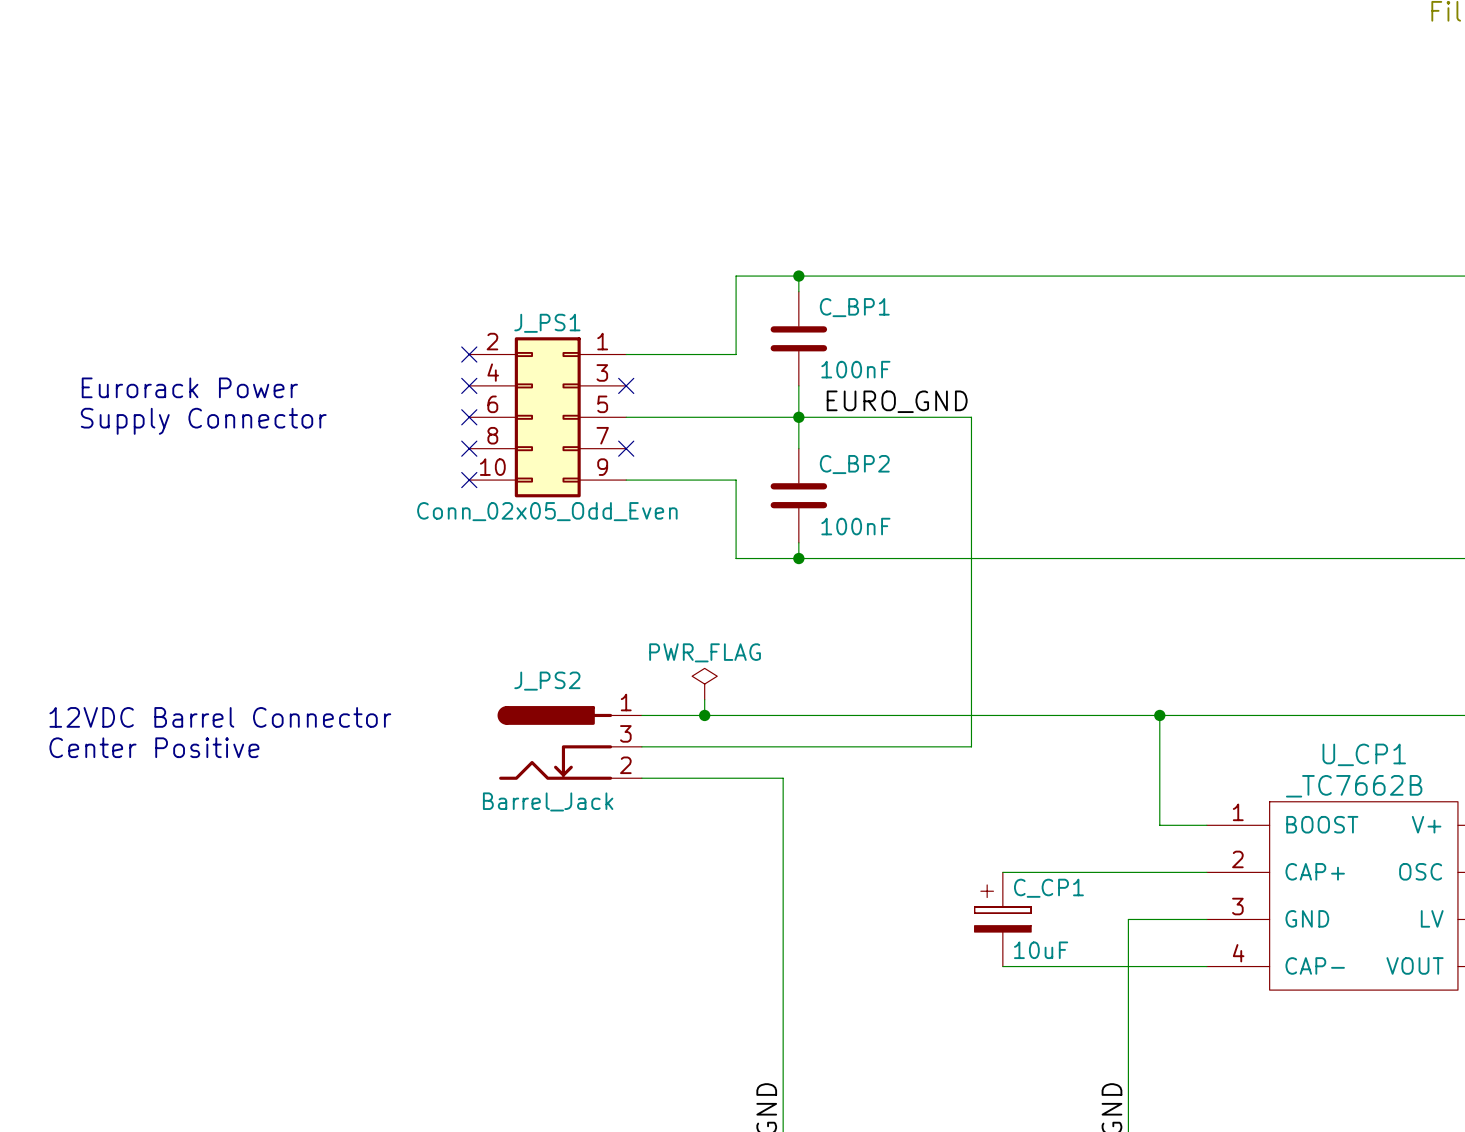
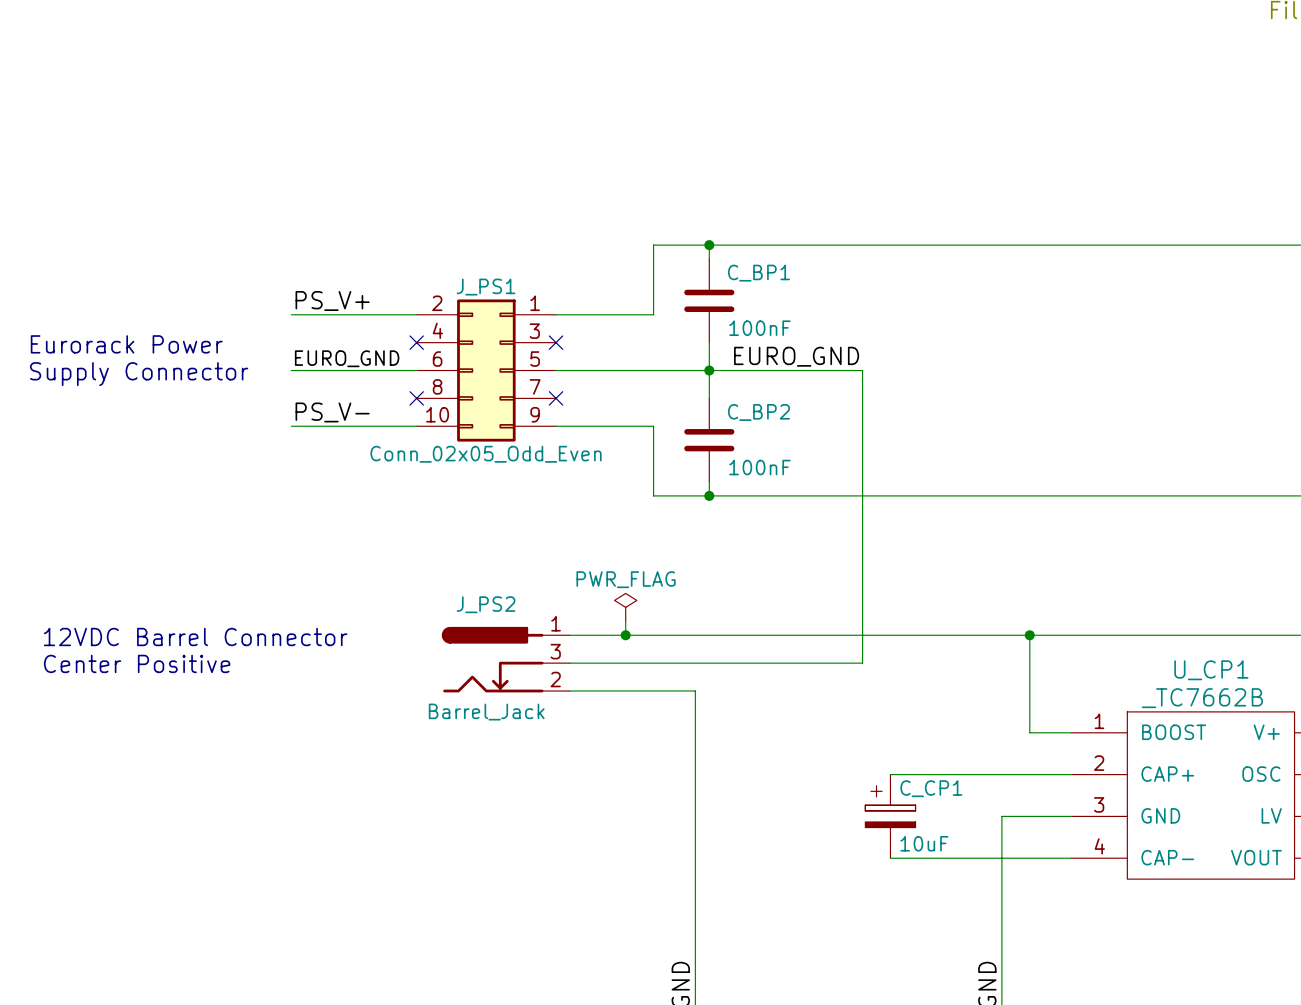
label: none -> PS_V+ (332, 300)
wire: none -> (291, 314) (416, 314)
no-connect mark: (469, 354) -> none
text position: Eurorack Power (189, 387) -> Eurorack Power (126, 344)
label: none -> EURO_GND (347, 358)
wire: none -> (291, 370) (416, 370)
no-connect mark: (469, 417) -> none
text position: Supply Connector (203, 421) -> Supply Connector (139, 374)
label: none -> PS_V- (332, 412)
wire: none -> (291, 426) (416, 426)
no-connect mark: (469, 480) -> none

